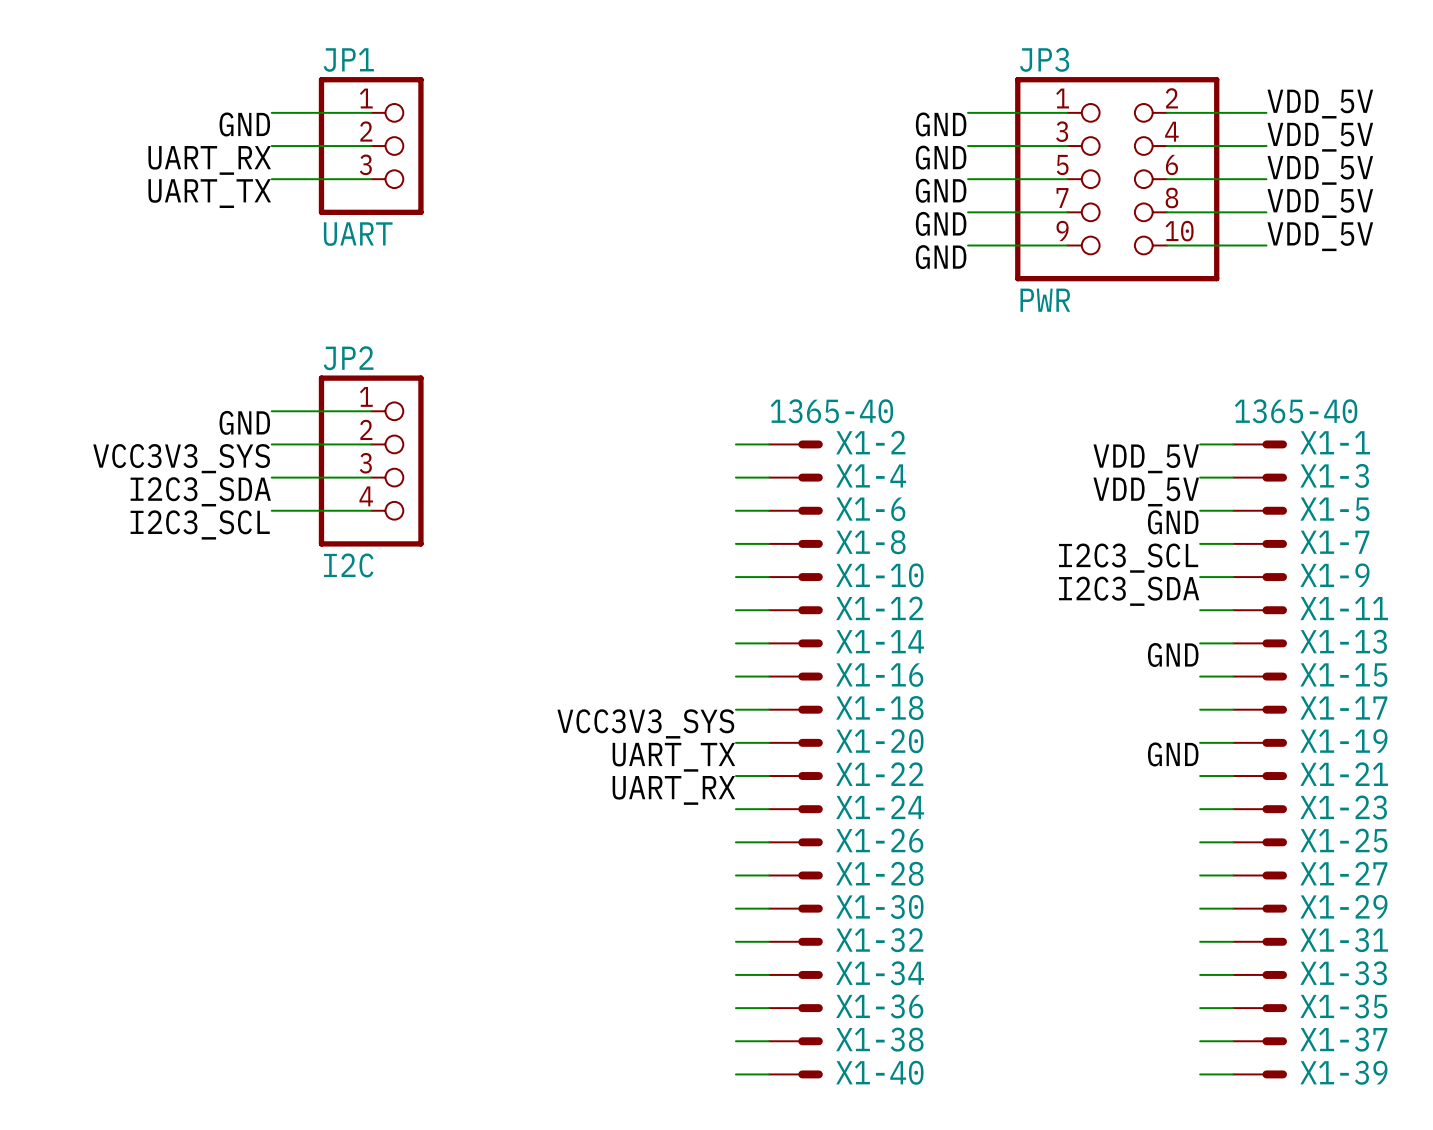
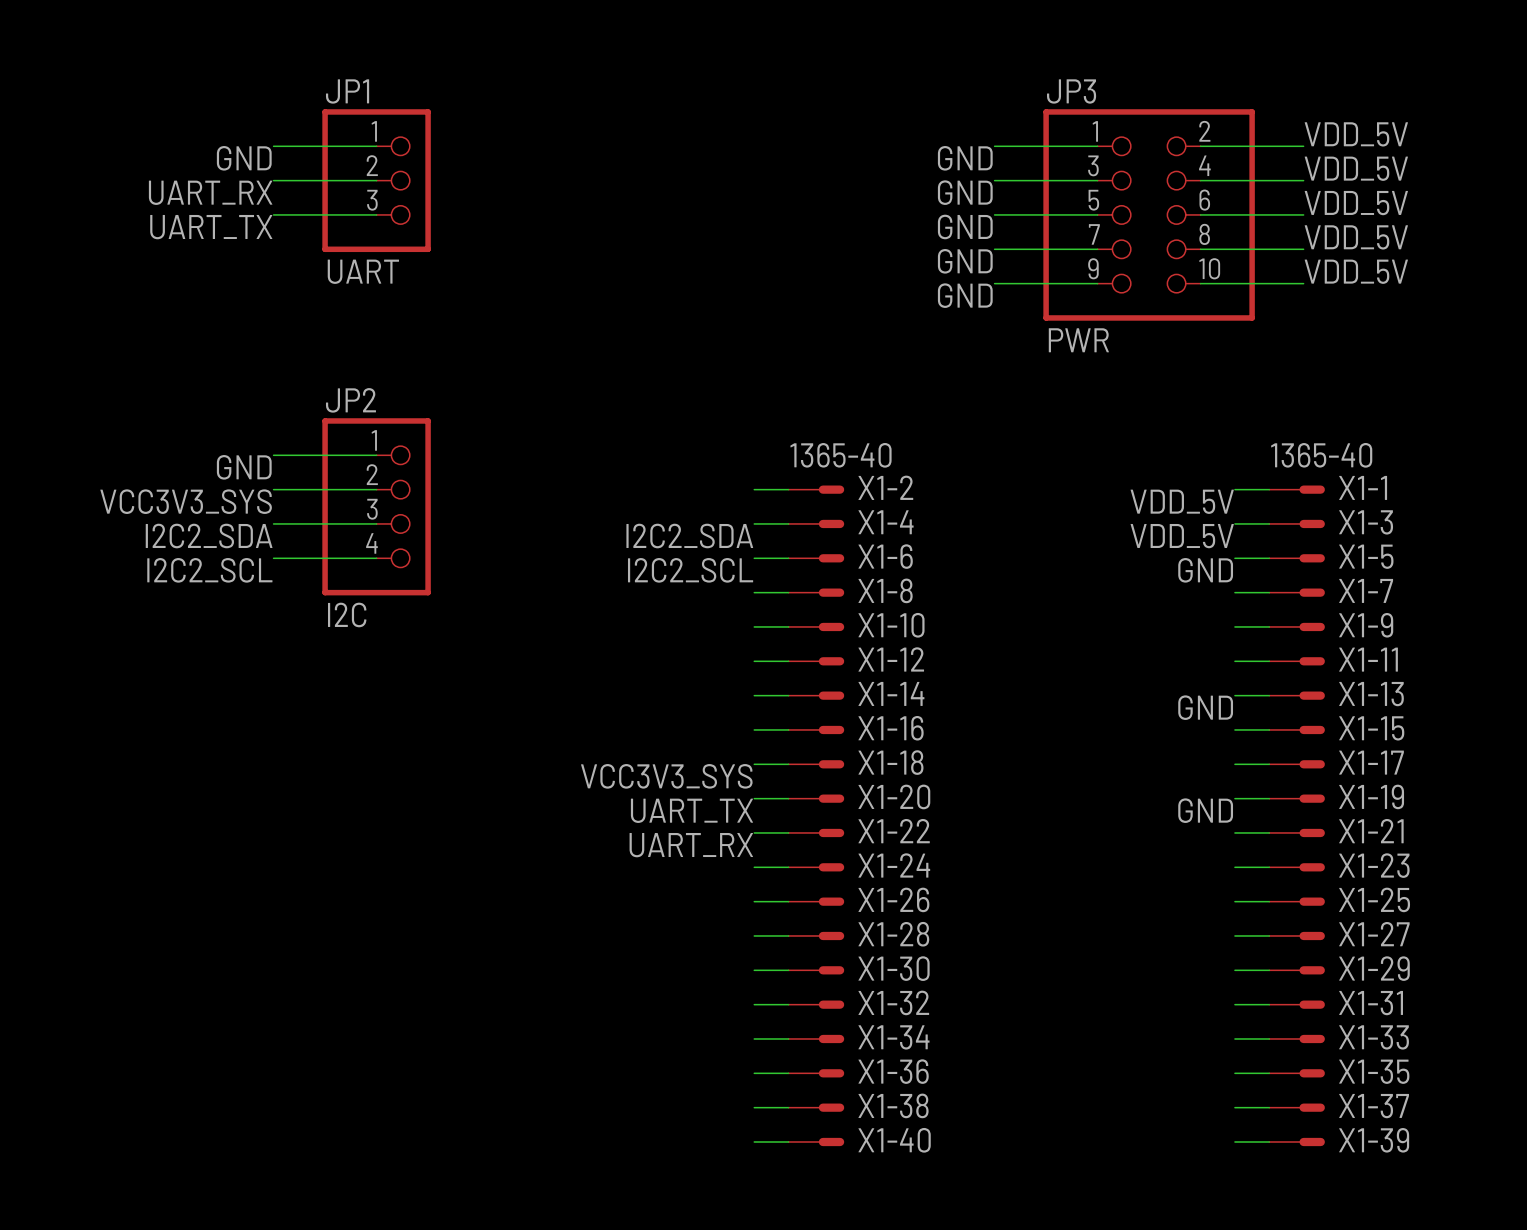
label: I2C3_SDA (200, 491) -> I2C2_SDA (209, 536)
label: none -> I2C2_SDA (689, 536)
label: I2C3_SCL (200, 524) -> I2C2_SCL (209, 570)
label: none -> I2C2_SCL (690, 570)
label: I2C3_SCL (1128, 558) -> none
label: I2C3_SDA (1129, 591) -> none

